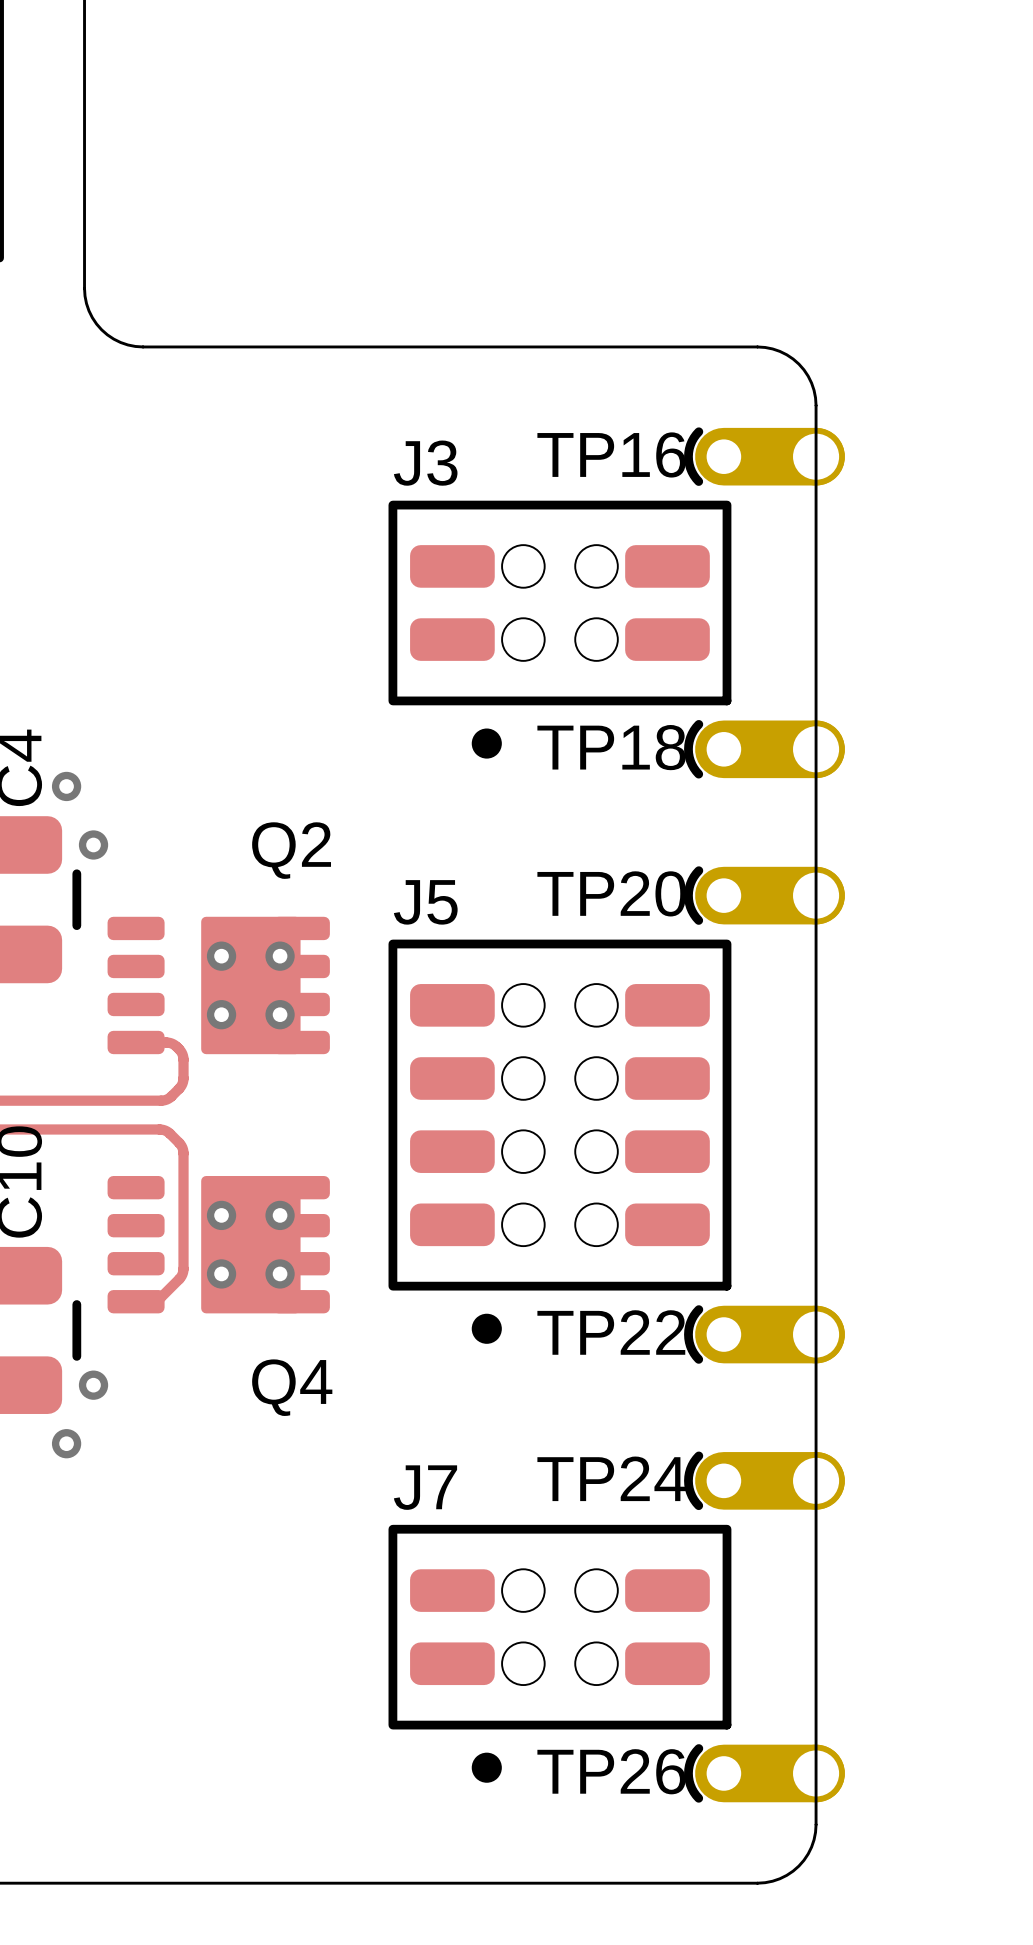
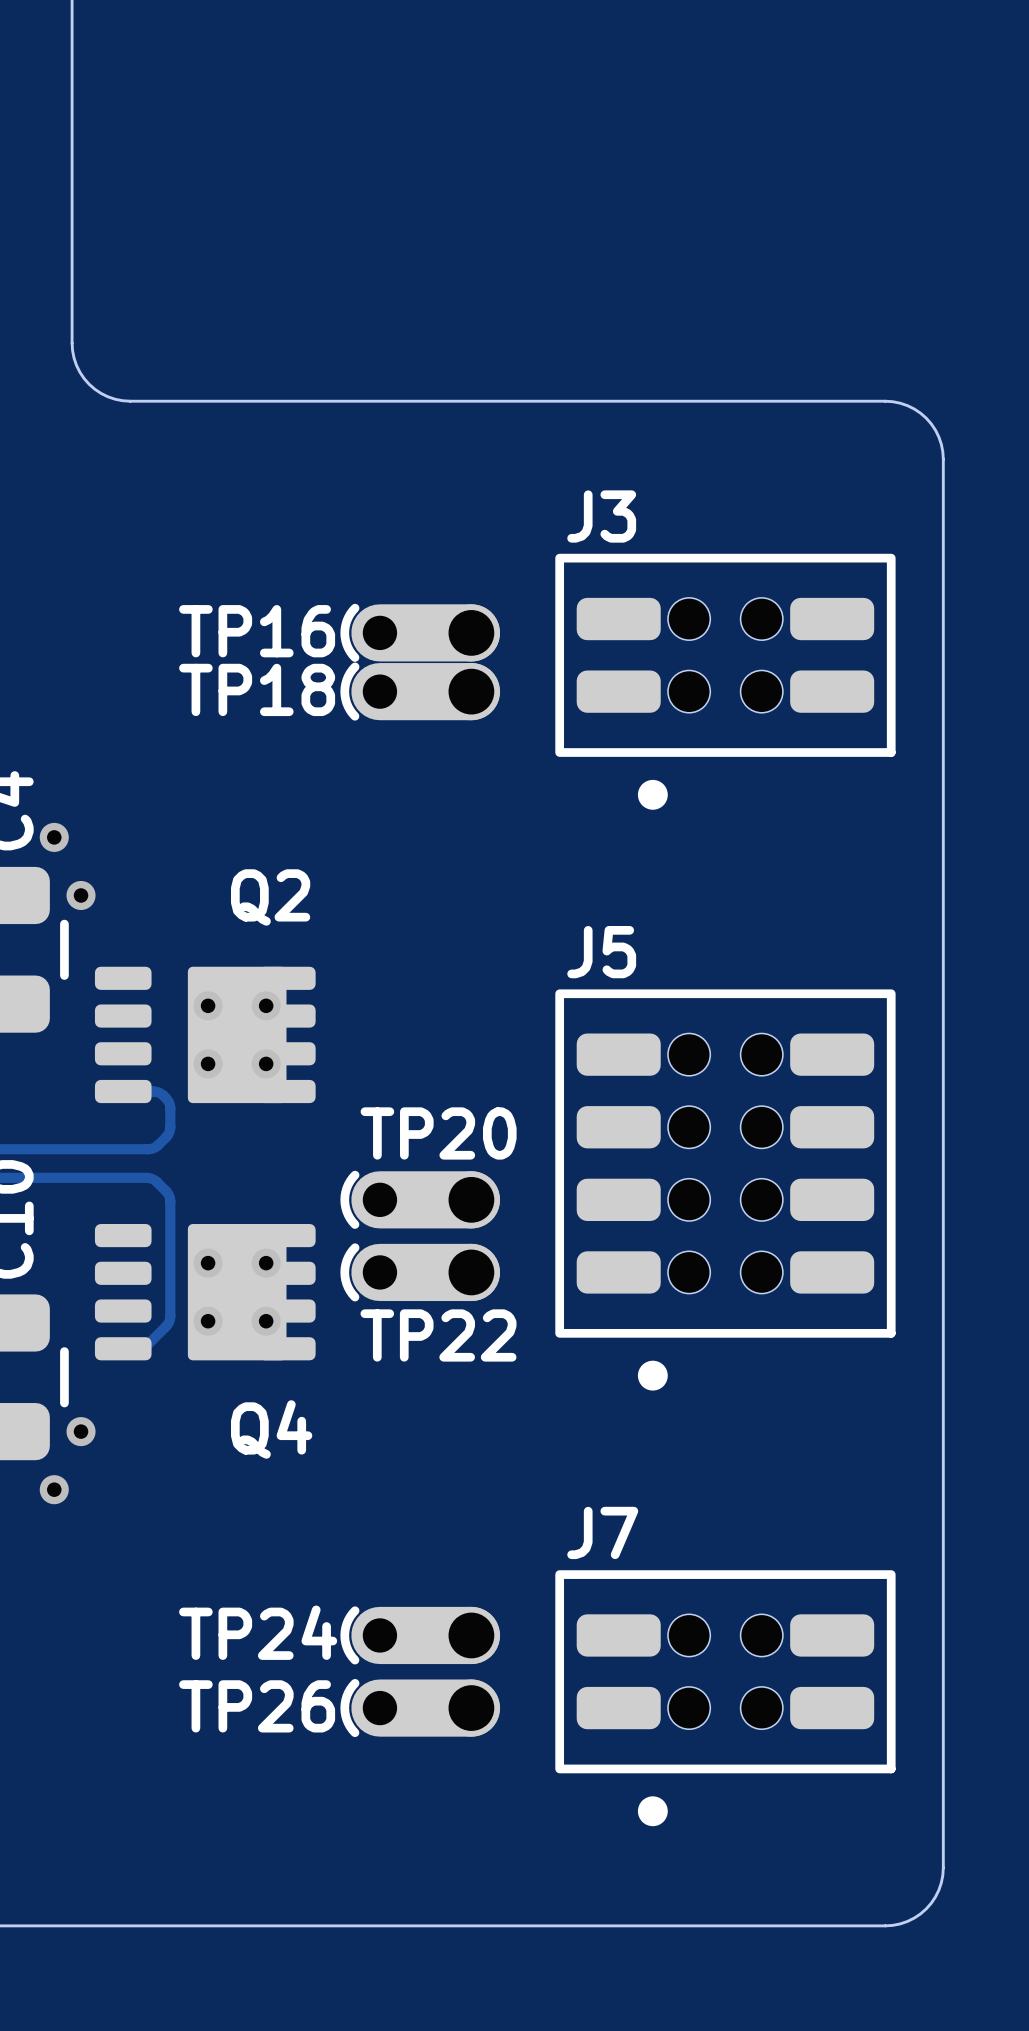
board edge: (757, 346) (779, 351) (798, 364) (811, 383) (816, 405) (816, 1824) (811, 1847) (798, 1866) (779, 1878) (757, 1883) -> (740, 401) (885, 401) (900, 403) (914, 409) (931, 423) (938, 437) (943, 459) (942, 1875) (938, 1890) (926, 1908) (914, 1918) (900, 1923) (885, 1925) (740, 1925)
TP16 position: (764, 456) -> (420, 632)
J3 position: (559, 629) -> (725, 681)
TP18 position: (764, 749) -> (420, 691)
TP20 name position: TP20 (611, 893) -> TP20 (438, 1133)
TP20 position: (764, 895) -> (420, 1199)
J5 position: (559, 1141) -> (725, 1189)
TP22 name position: TP22 (611, 1332) -> TP22 (438, 1335)
TP22 position: (764, 1334) -> (420, 1272)
TP24 position: (764, 1480) -> (420, 1635)
J7 position: (559, 1653) -> (725, 1698)
TP26 position: (764, 1773) -> (420, 1708)

